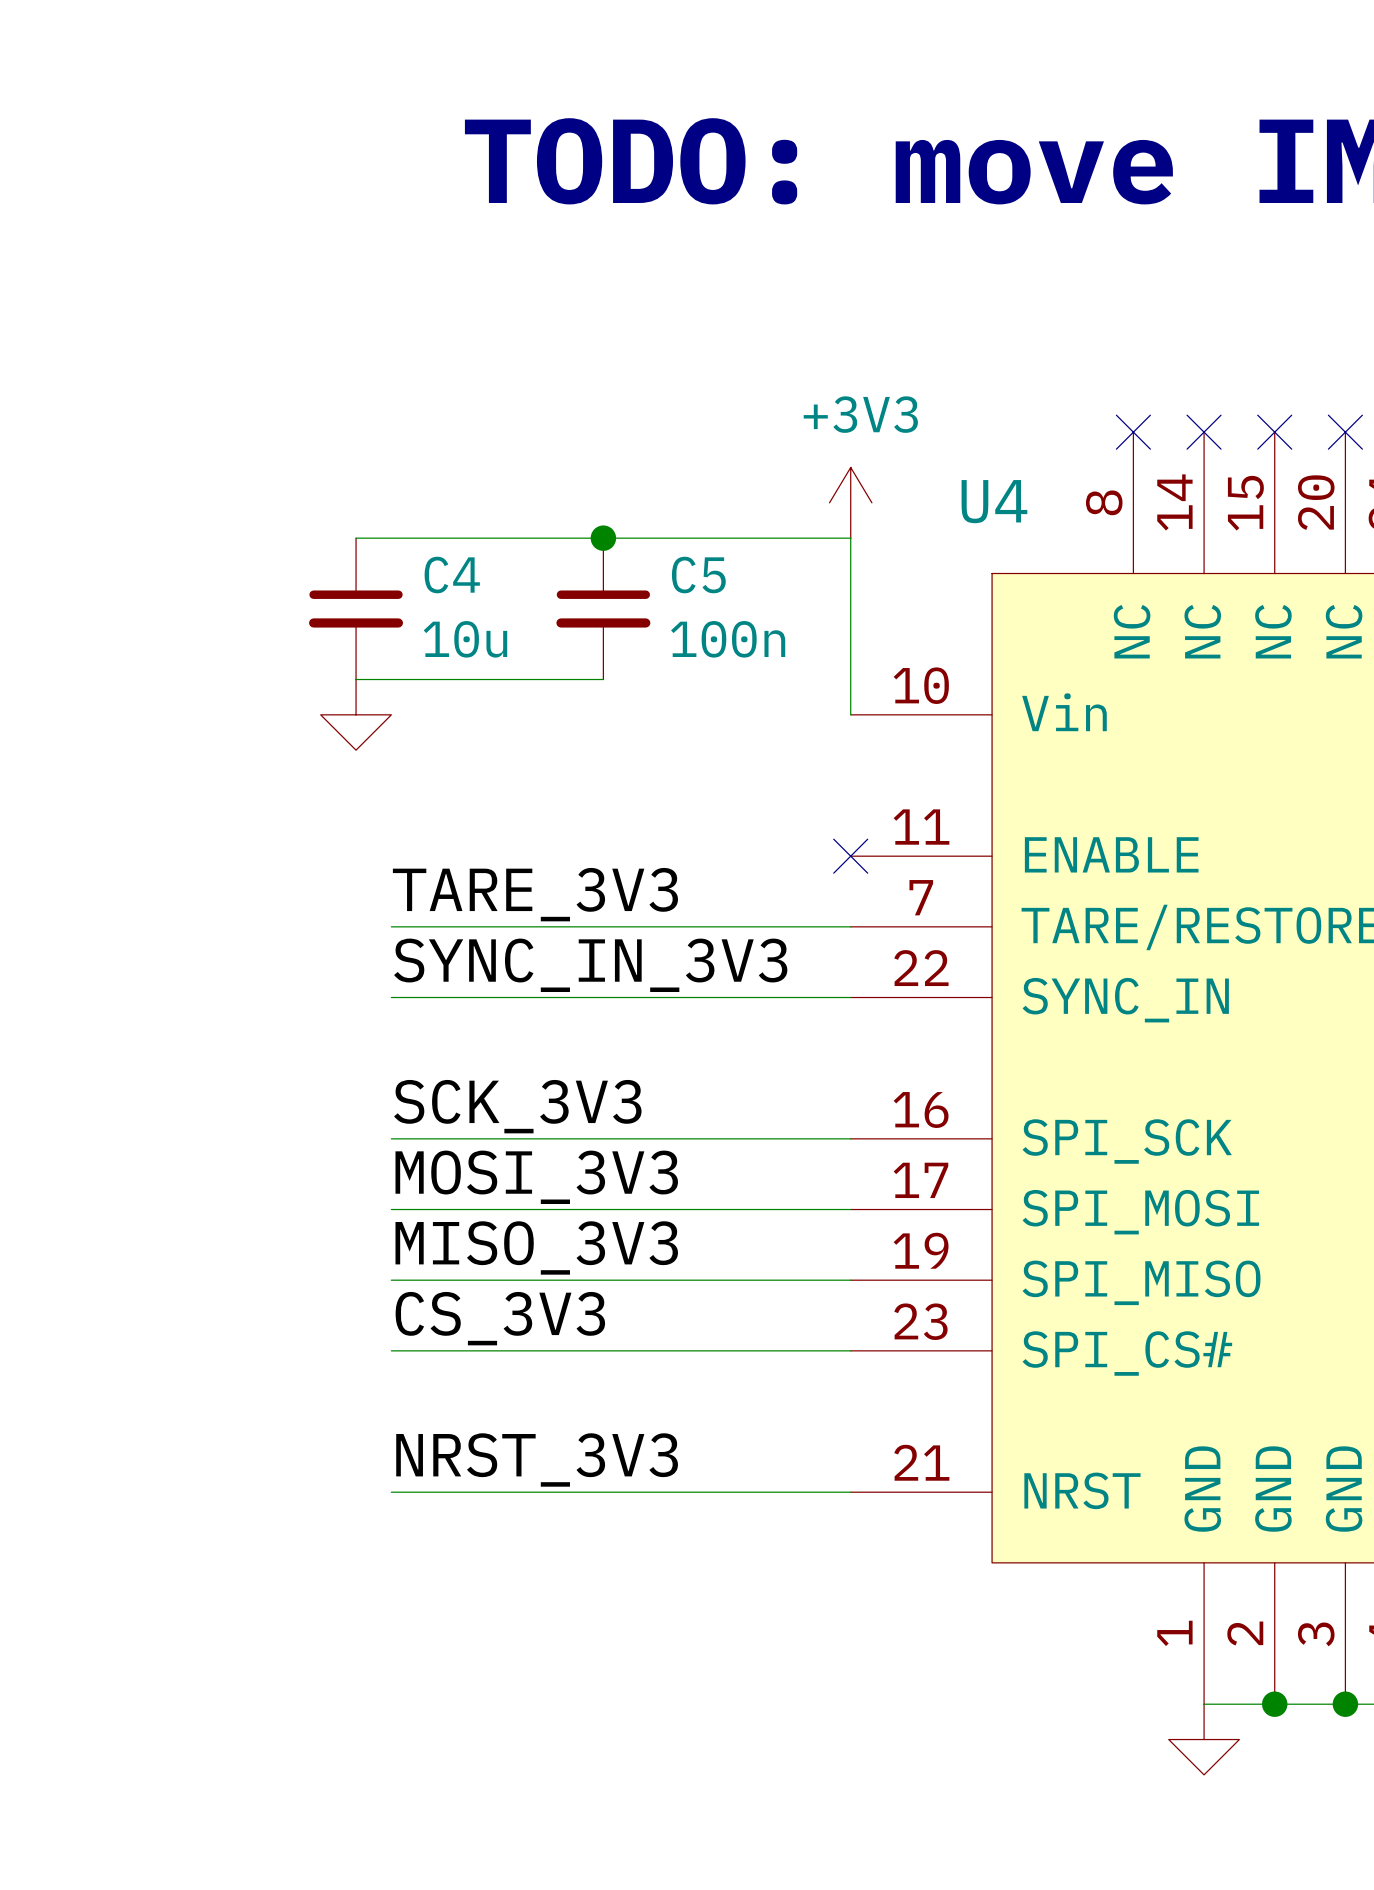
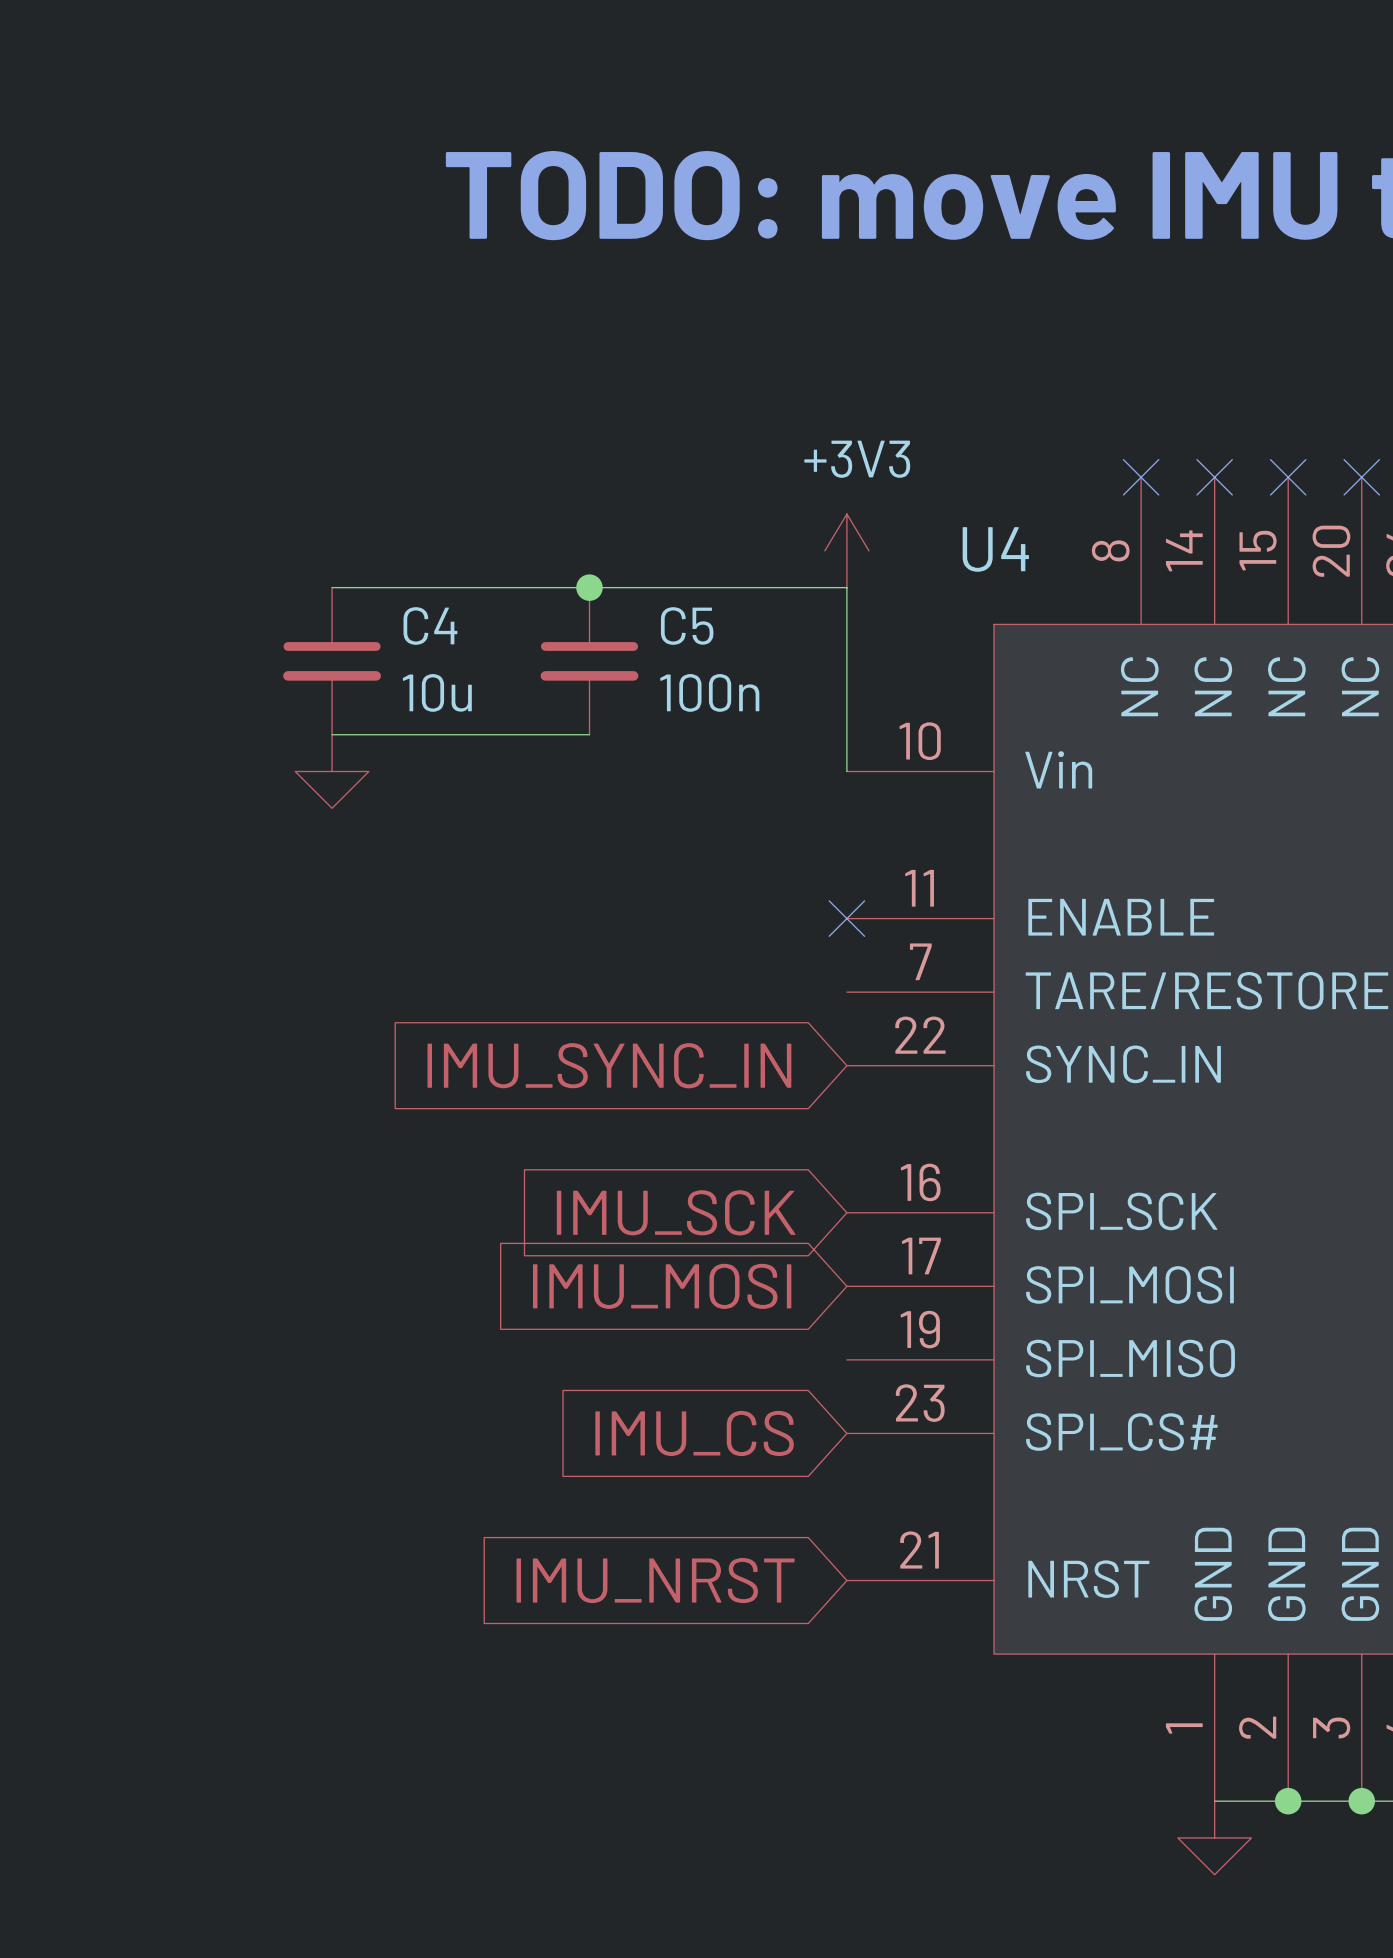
label: TARE_3V3 (535, 894) -> none
wire: (391, 926) (850, 926) -> none
label: SYNC_IN_3V3 (590, 965) -> none
wire: (391, 997) (850, 997) -> none
global label: none -> IMU_SYNC_IN (609, 1065)
label: SCK_3V3 (517, 1106) -> none
wire: (391, 1138) (850, 1138) -> none
global label: none -> IMU_SCK (676, 1212)
label: MOSI_3V3 (536, 1177) -> none
wire: (391, 1209) (850, 1209) -> none
global label: none -> IMU_MOSI (662, 1286)
label: MISO_3V3 (536, 1247) -> none
wire: (391, 1280) (850, 1280) -> none
label: CS_3V3 (500, 1318) -> none
wire: (391, 1350) (850, 1350) -> none
global label: none -> IMU_CS (694, 1433)
label: NRST_3V3 (537, 1459) -> none
wire: (391, 1492) (850, 1492) -> none
global label: none -> IMU_NRST (655, 1580)

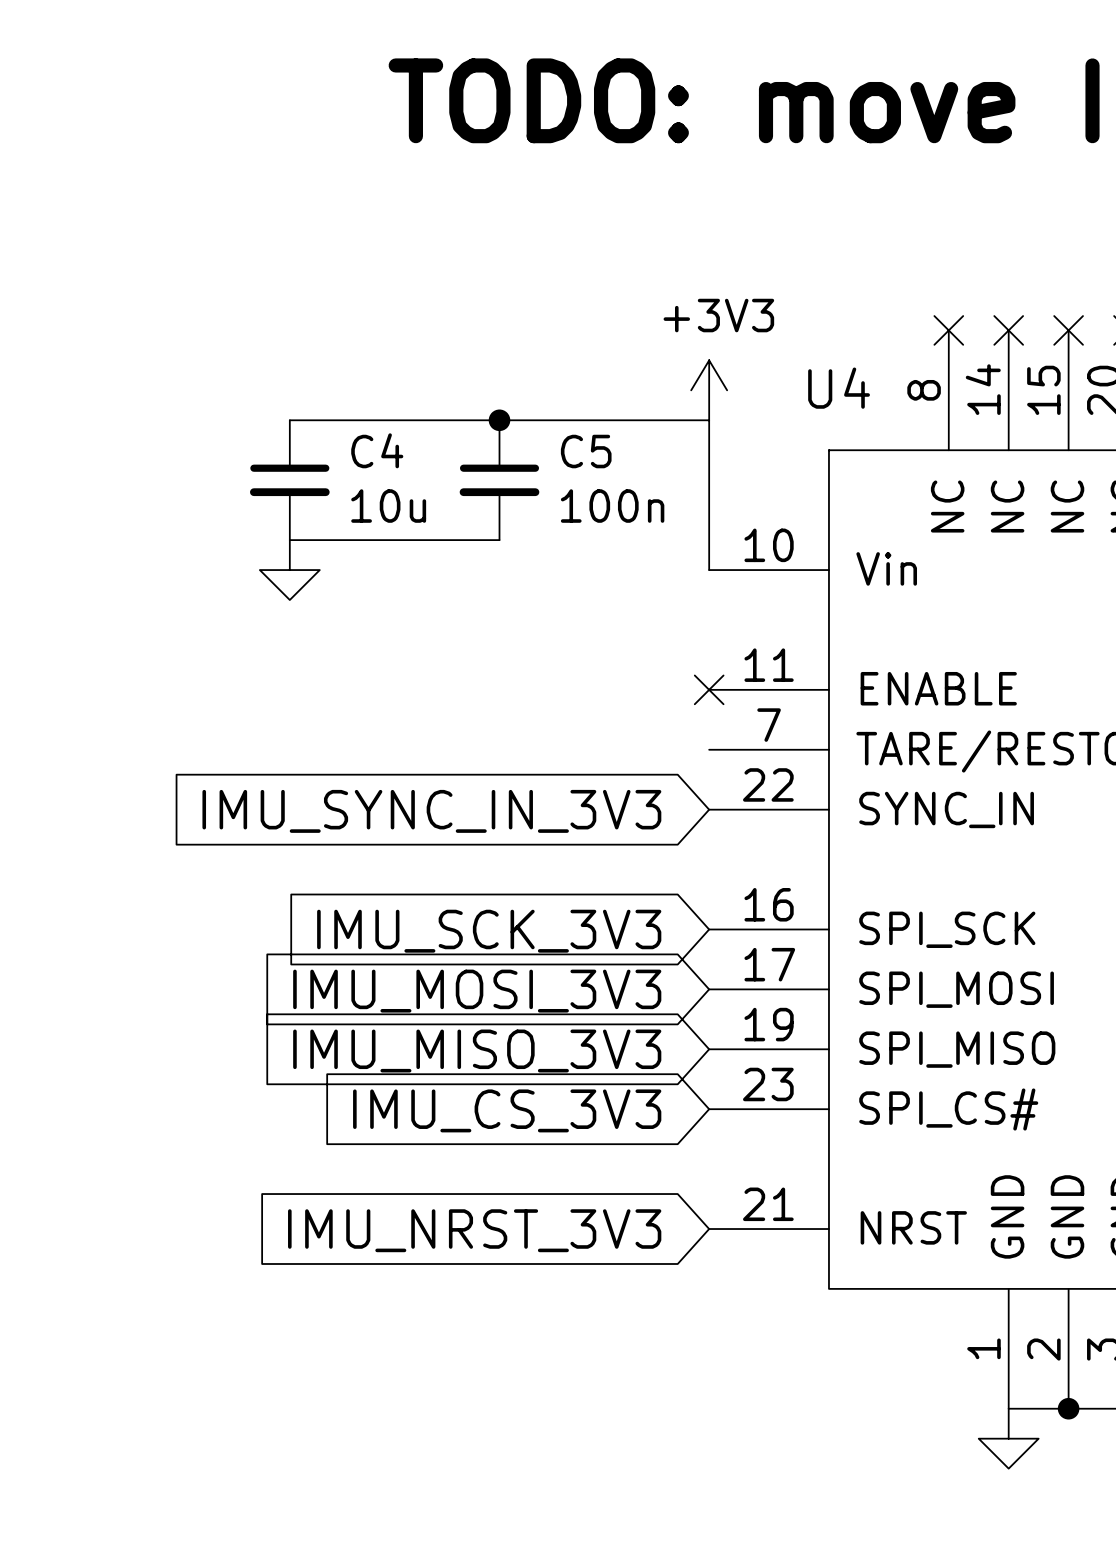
global label: IMU_SYNC_IN (609, 1065) -> IMU_SYNC_IN_3V3 (431, 811)
global label: IMU_SCK (676, 1212) -> IMU_SCK_3V3 (489, 931)
global label: IMU_MOSI (662, 1286) -> IMU_MOSI_3V3 (477, 991)
global label: none -> IMU_MISO_3V3 (477, 1051)
global label: IMU_CS (694, 1433) -> IMU_CS_3V3 (507, 1110)
global label: IMU_NRST (655, 1580) -> IMU_NRST_3V3 (474, 1230)

